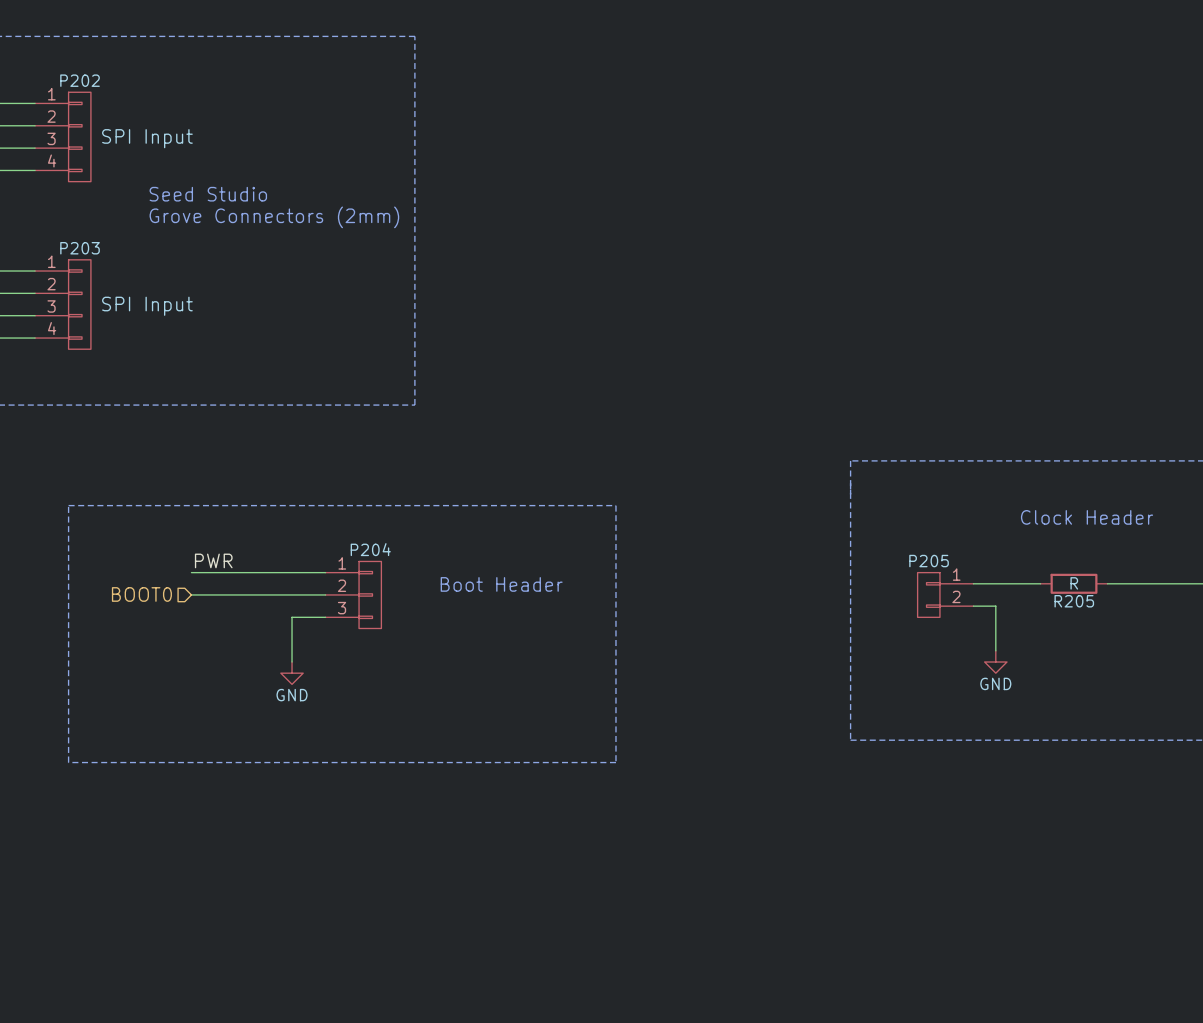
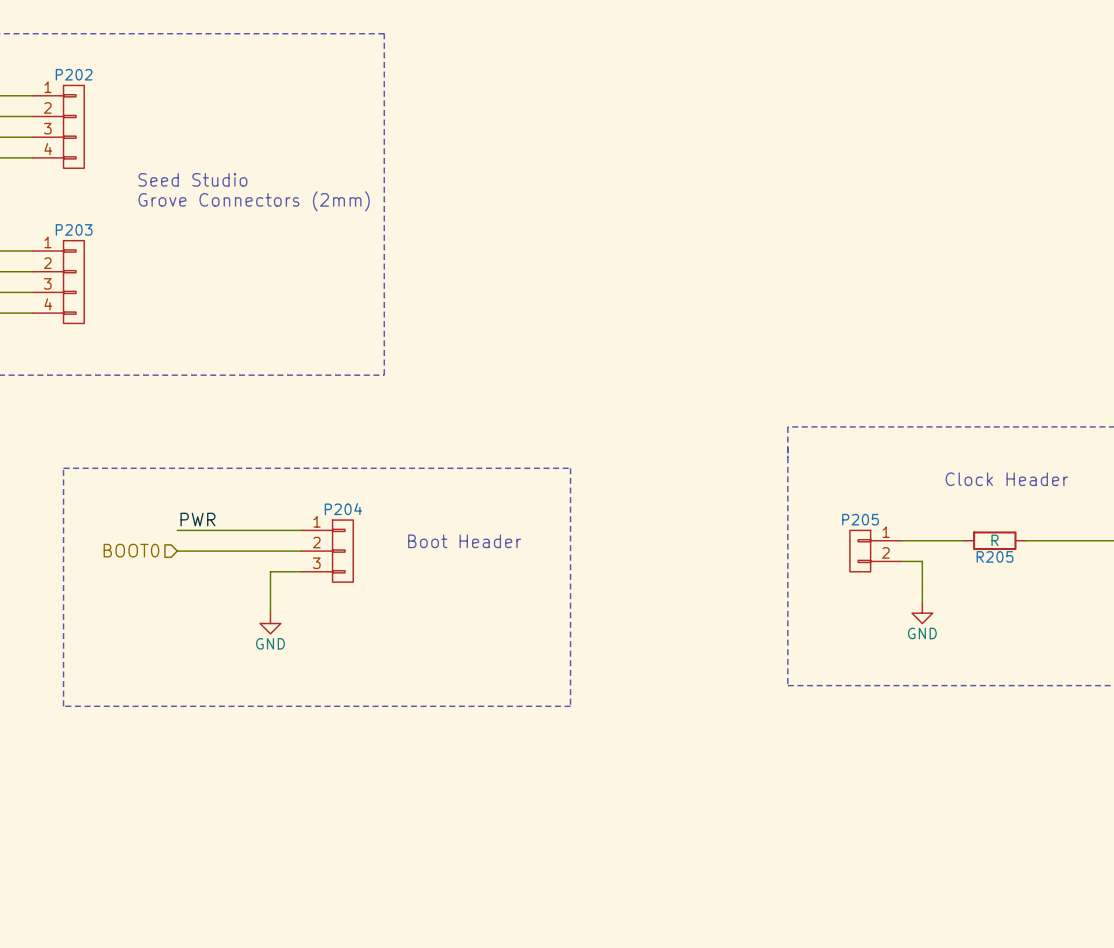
P202 text: SPI Input (147, 138) -> none
P203 text: SPI Input (147, 306) -> none

